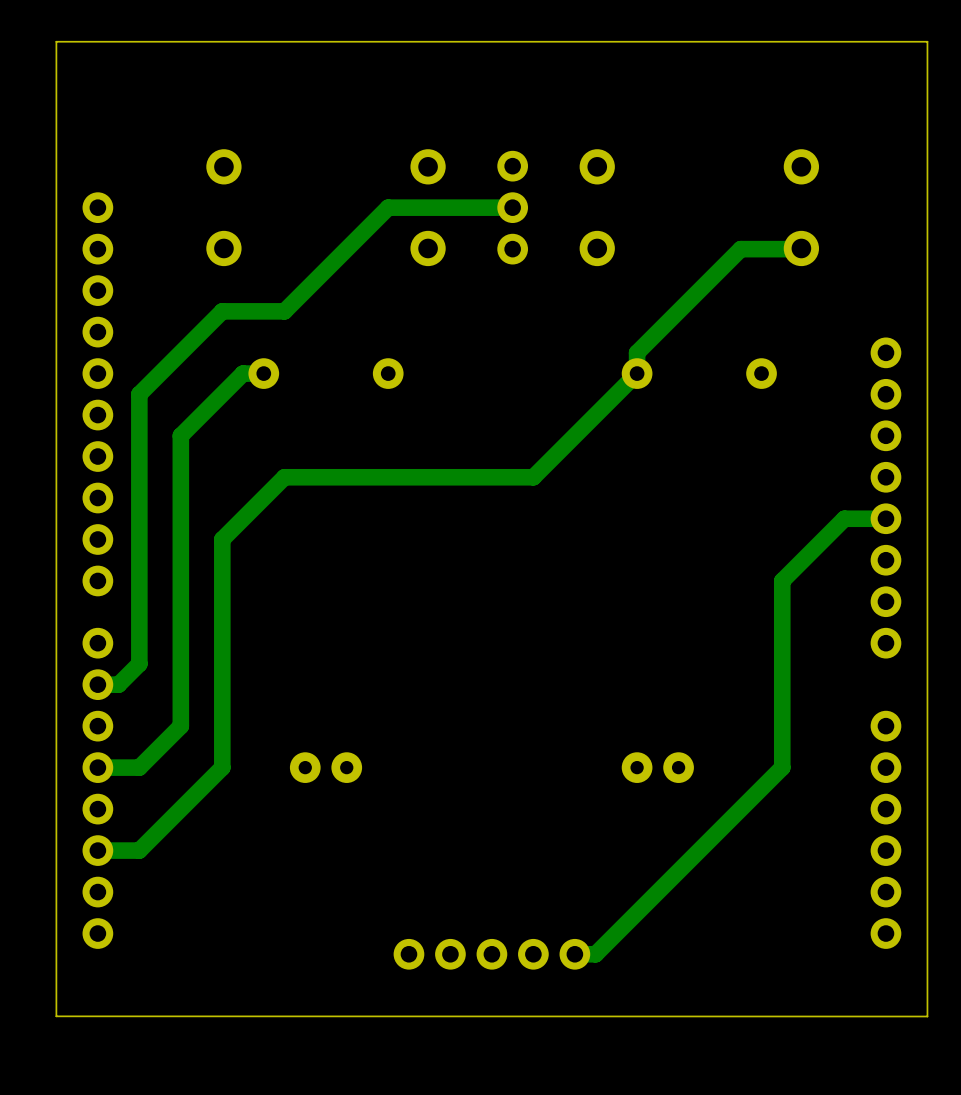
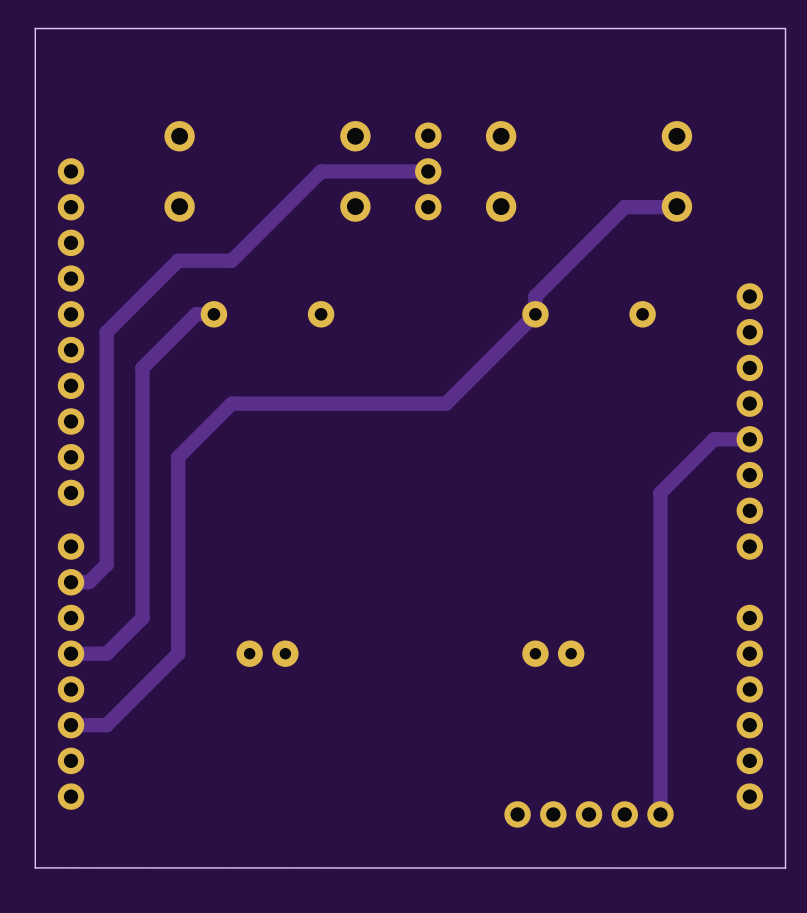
track: (782, 767) (595, 954) (574, 954) -> (660, 653) (660, 814)
part position: (491, 954) -> (589, 814)

